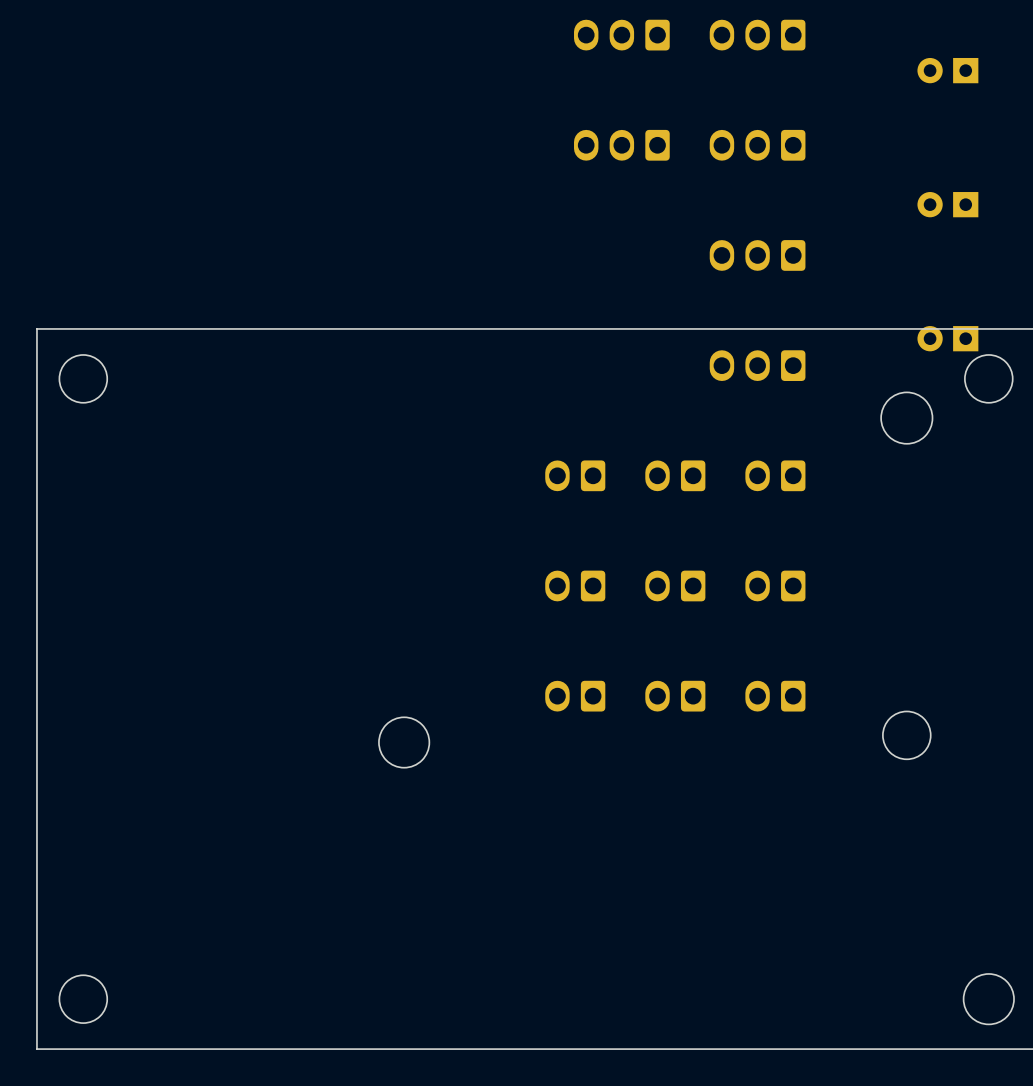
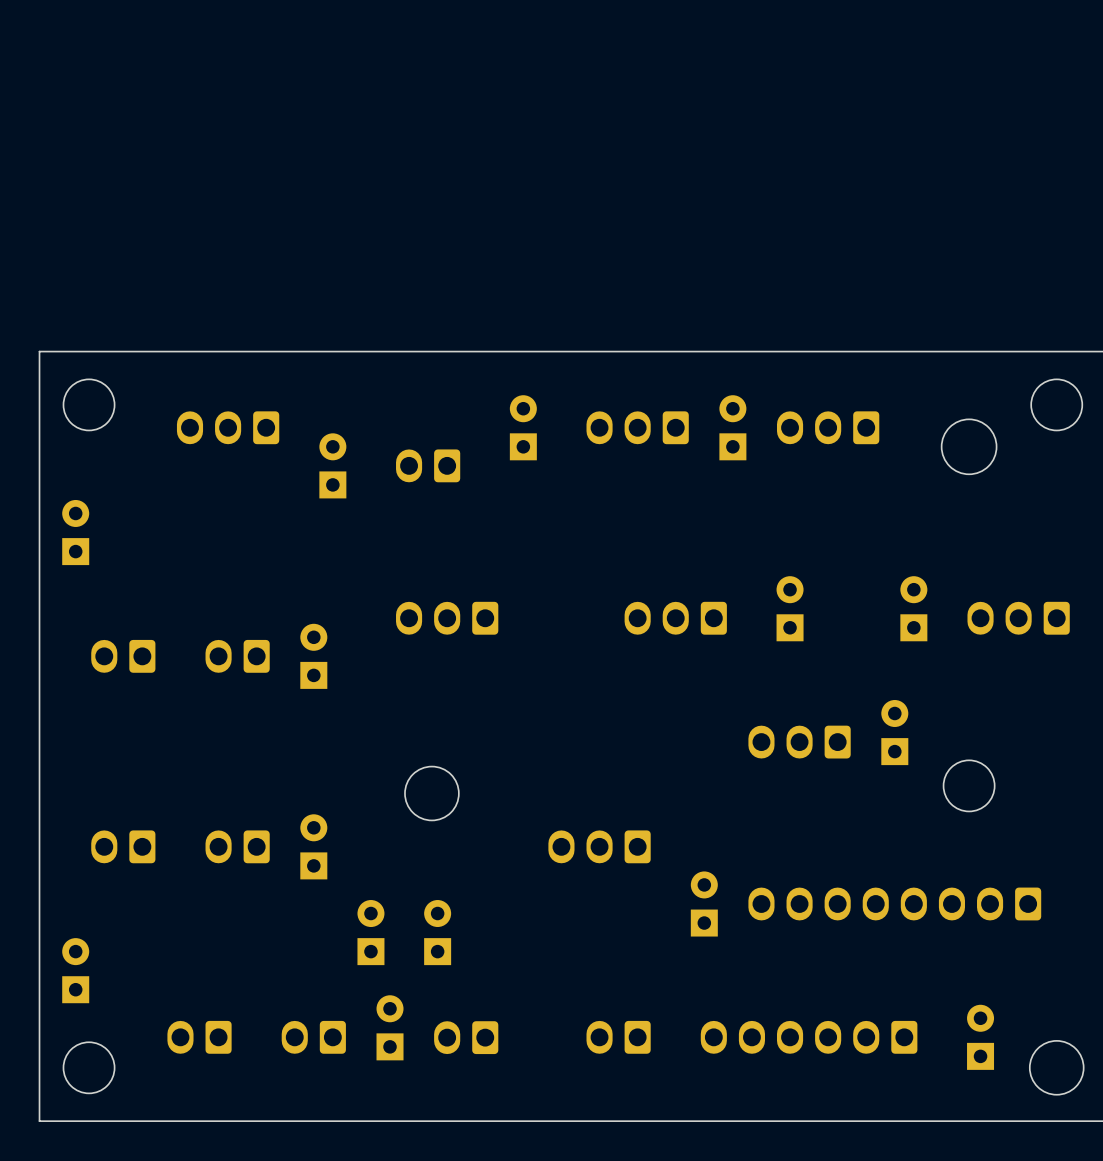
part: (621, 35) -> none
part: (757, 35) -> none
part: (947, 70) -> none
part: (621, 145) -> none
part: (757, 145) -> none
part: (947, 204) -> none
part: (757, 255) -> none
part: (947, 338) -> none
part position: (757, 365) -> (828, 427)
part: none -> (228, 427)
part: none -> (523, 427)
part: none -> (637, 427)
part: none -> (732, 427)
part: none -> (332, 465)
part: none -> (428, 465)
part: (575, 475) -> none
part: (675, 475) -> none
part: (775, 475) -> none
part: none -> (75, 532)
part: none -> (790, 608)
part: none -> (913, 608)
part: none -> (447, 618)
part: none -> (675, 618)
part: none -> (1018, 618)
part: (575, 585) -> none
part: (675, 585) -> none
part: (775, 585) -> none
part: none -> (123, 656)
part: none -> (237, 656)
part: none -> (313, 656)
part: none -> (894, 732)
part: none -> (799, 742)
part: (575, 696) -> none
part: (675, 696) -> none
part: (775, 696) -> none
part: none -> (123, 846)
part: none -> (237, 846)
part: none -> (313, 846)
part: none -> (599, 846)
part: none -> (704, 903)
part: none -> (894, 903)
part: none -> (370, 932)
part: none -> (437, 932)
part: none -> (75, 970)
part: none -> (390, 1027)
part: none -> (199, 1037)
part: none -> (313, 1037)
part: none -> (466, 1037)
part: none -> (618, 1037)
part: none -> (809, 1037)
part: none -> (980, 1037)

